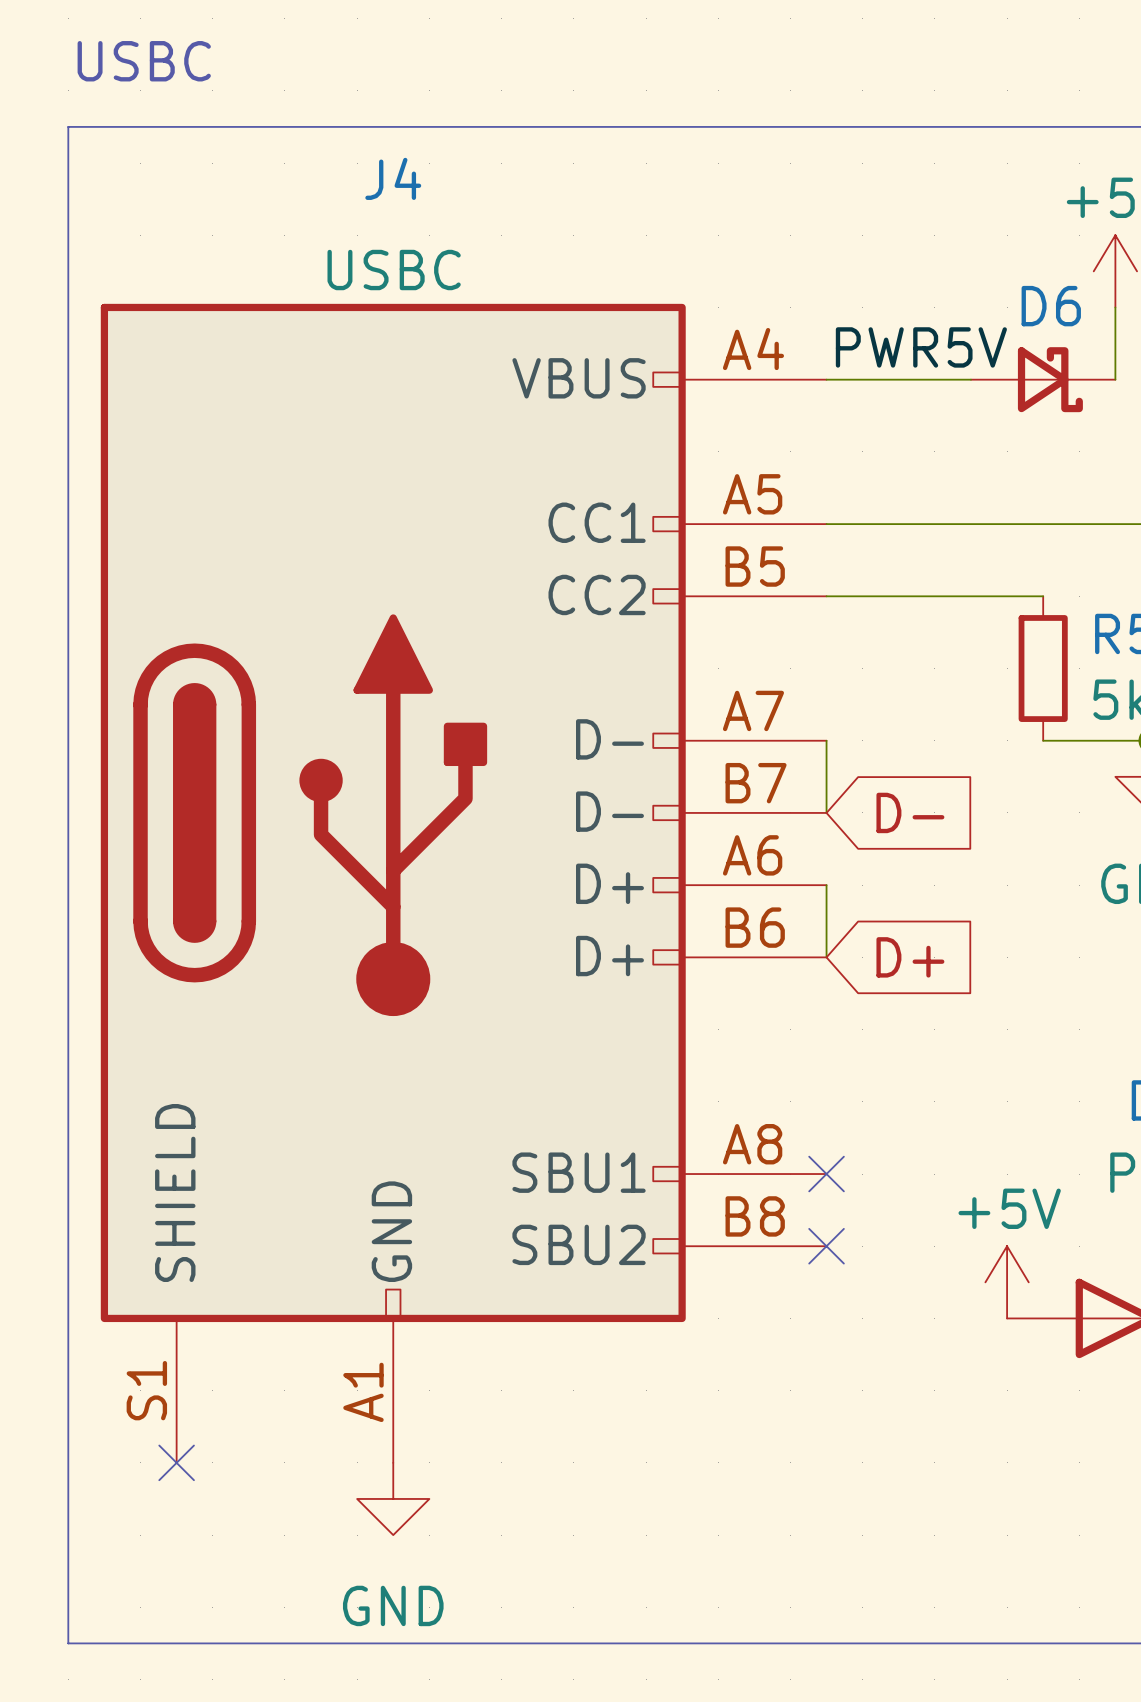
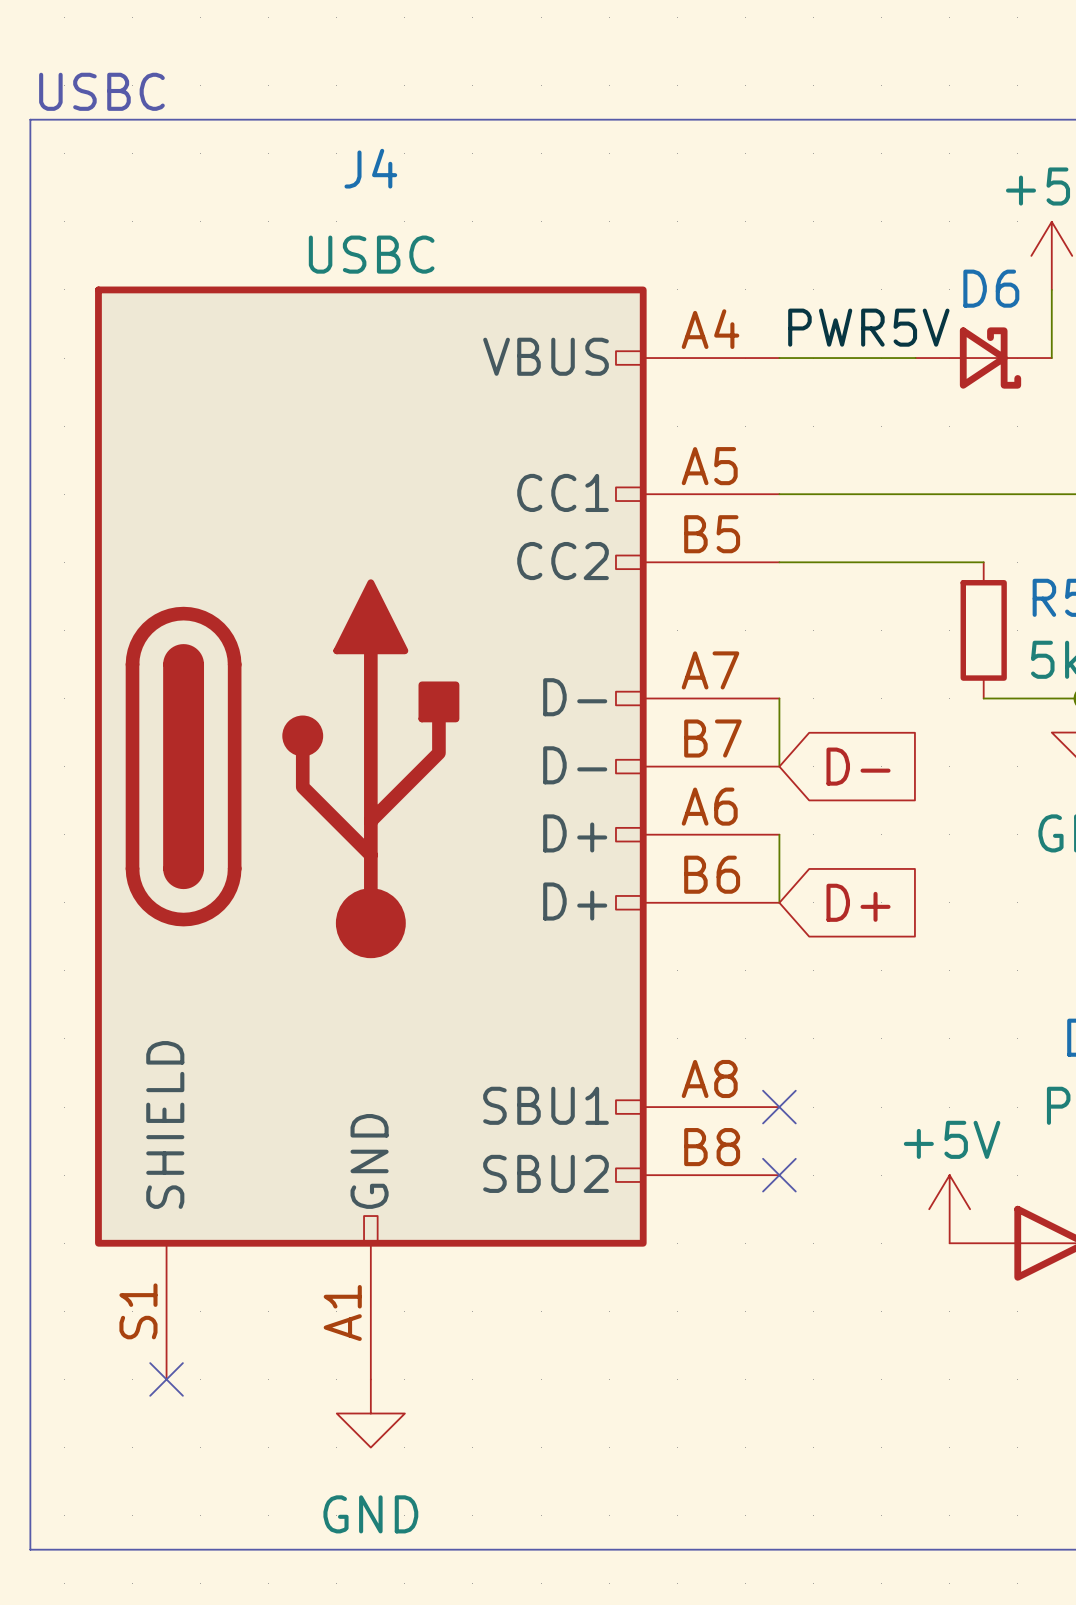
text position: USBC (144, 61) -> USBC (101, 91)
line: (68, 126) (68, 1643) -> (64, 119) (30, 119) (30, 1549) (64, 1549)

